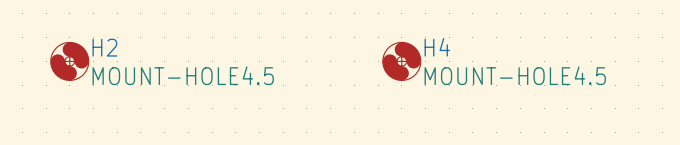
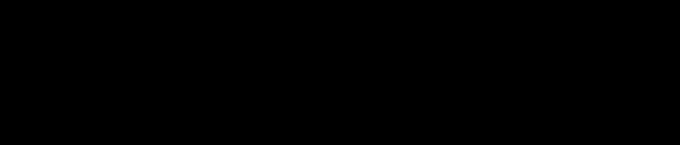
H2: MOUNT-HOLE4.5 (69, 61) -> none
H4: MOUNT-HOLE4.5 (401, 61) -> none

